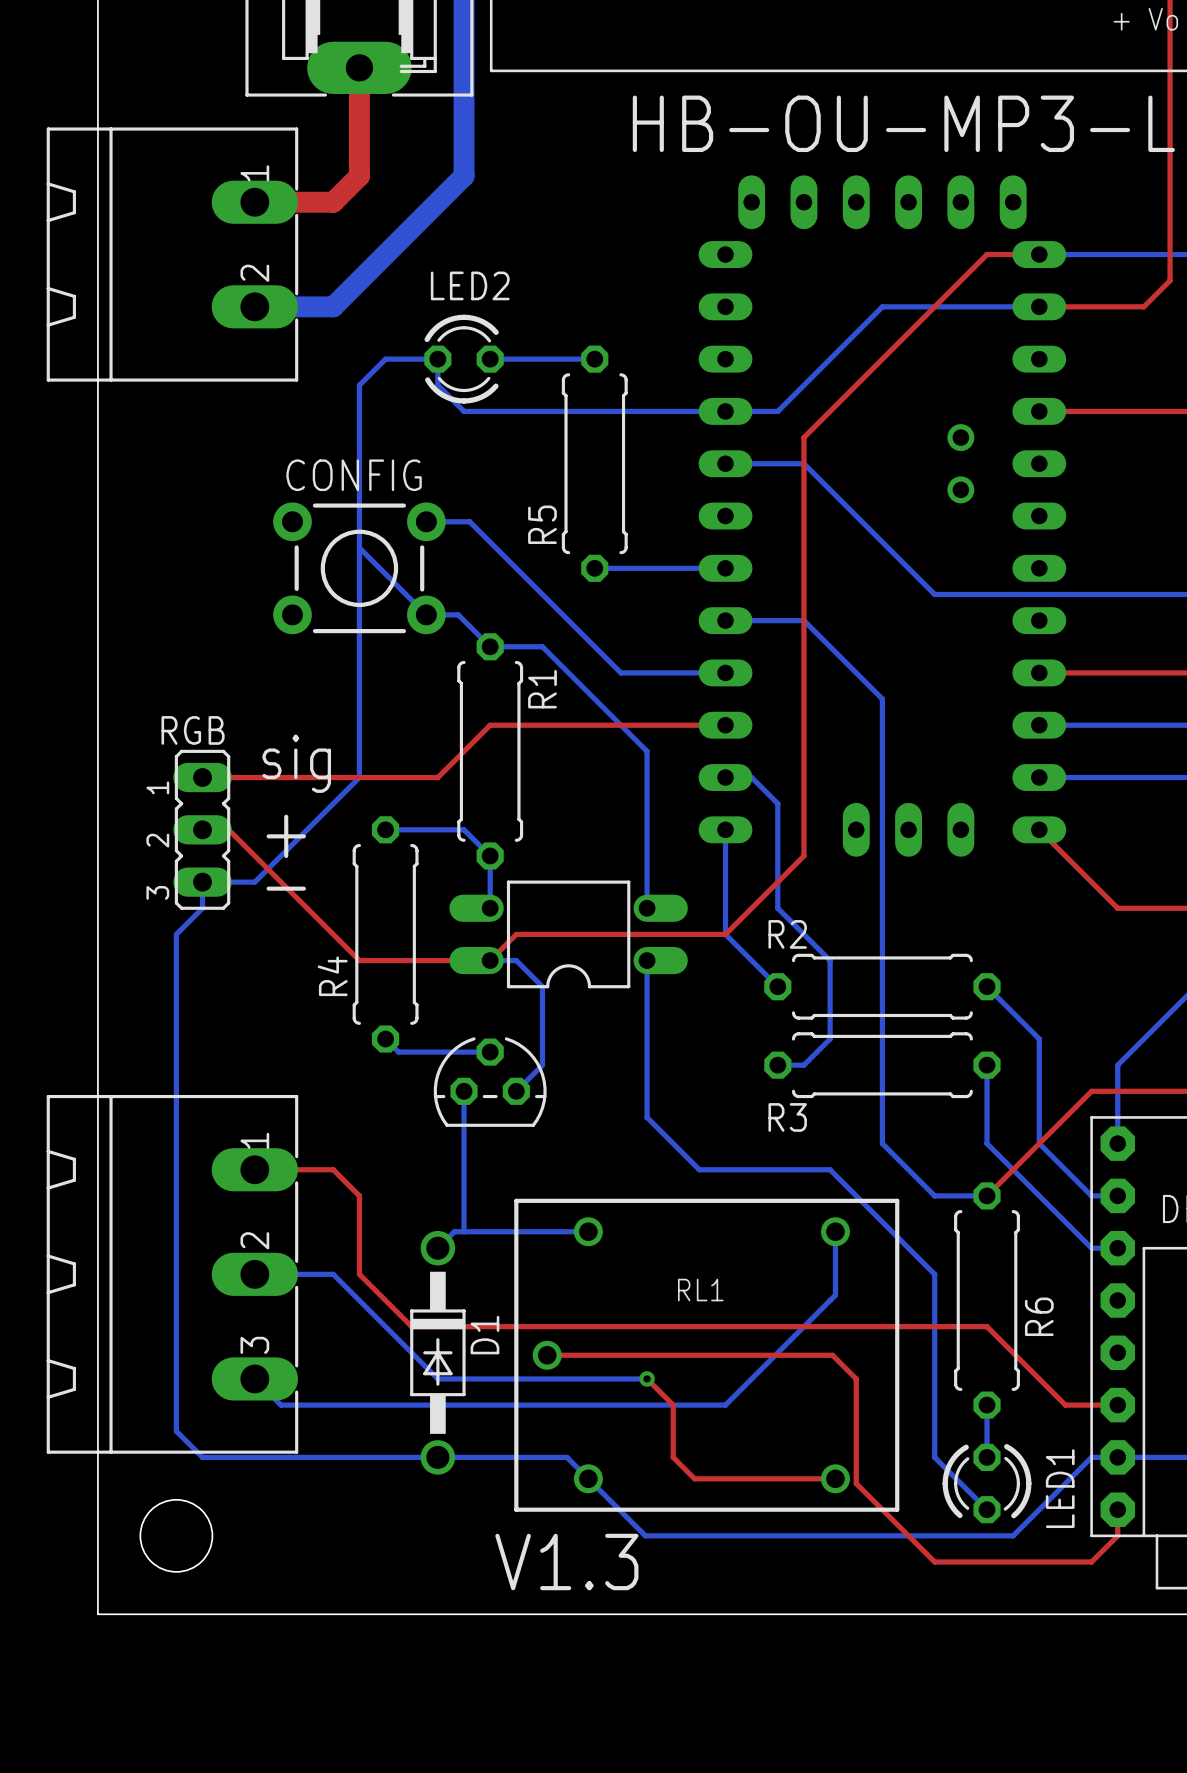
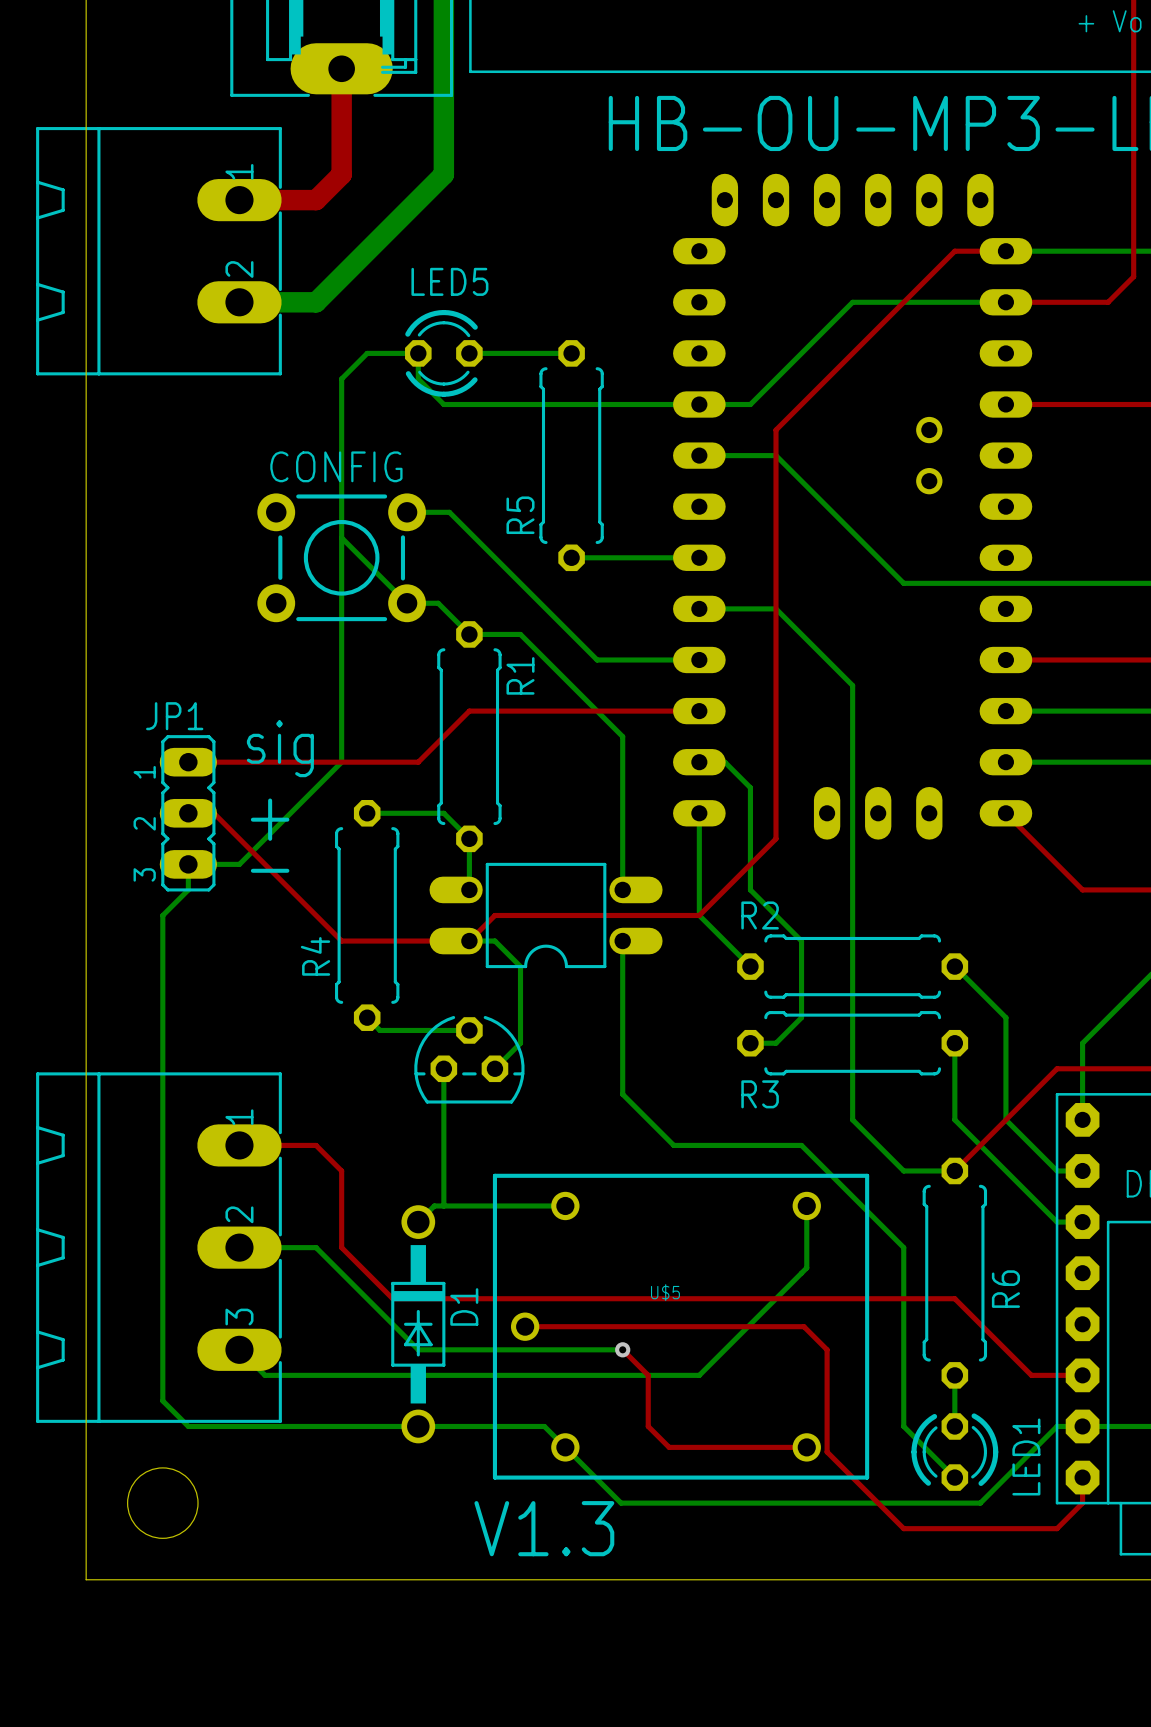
LED2 name: LED2 (470, 285) -> LED5 (449, 281)
RGB name: RGB (193, 730) -> JP1 (174, 716)
RL1 name: RL1 (700, 1290) -> U$5 (665, 1292)

